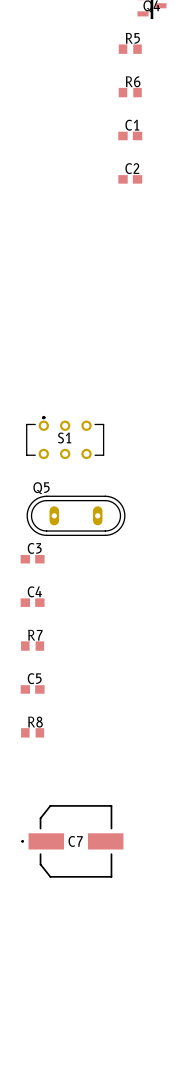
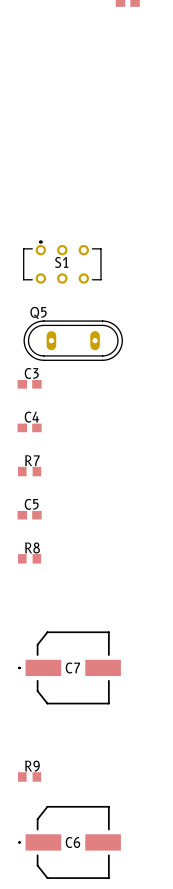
R9: none -> (29, 776)
C6: none -> (69, 842)

